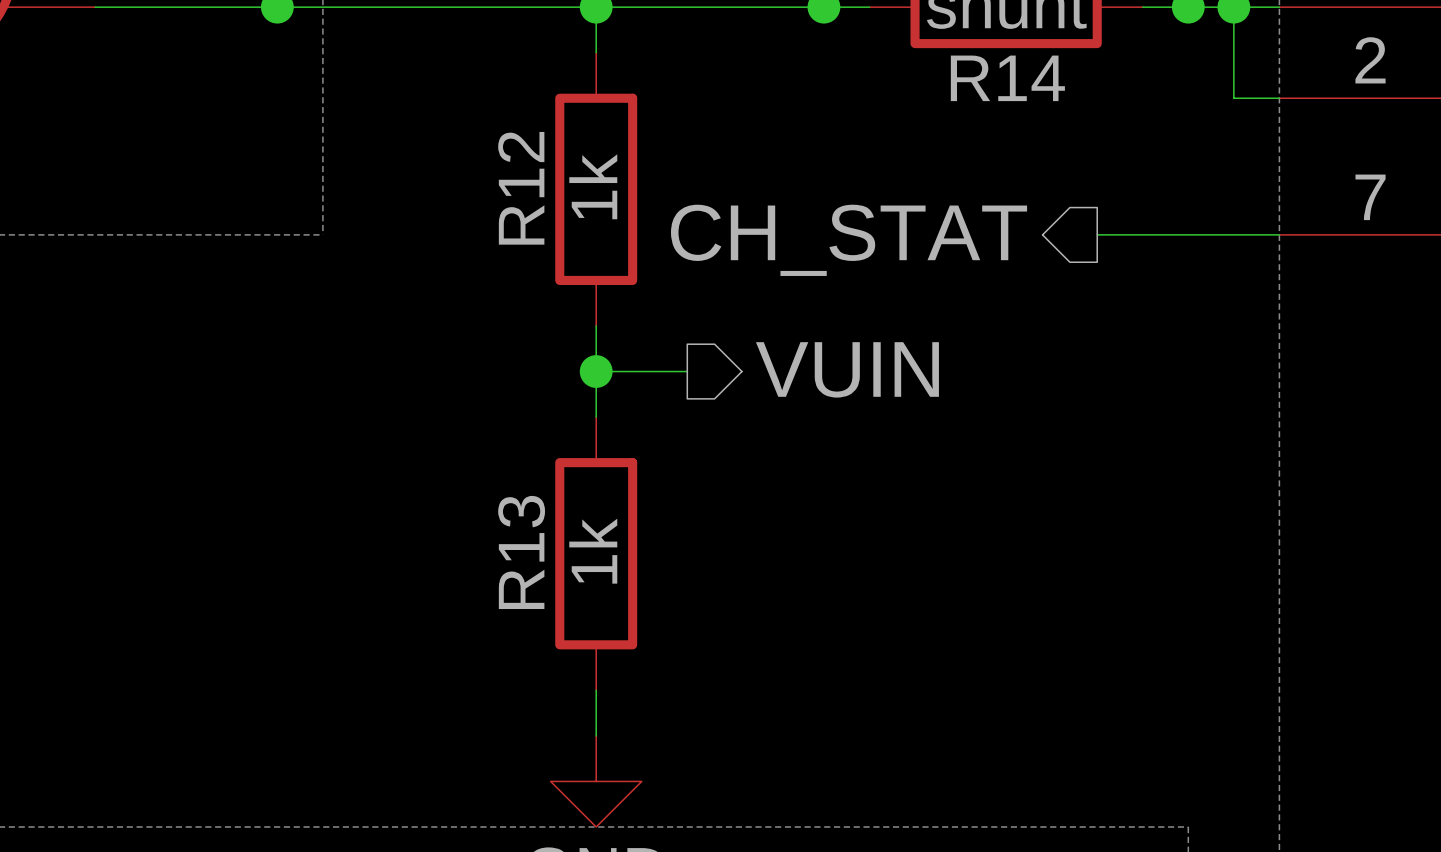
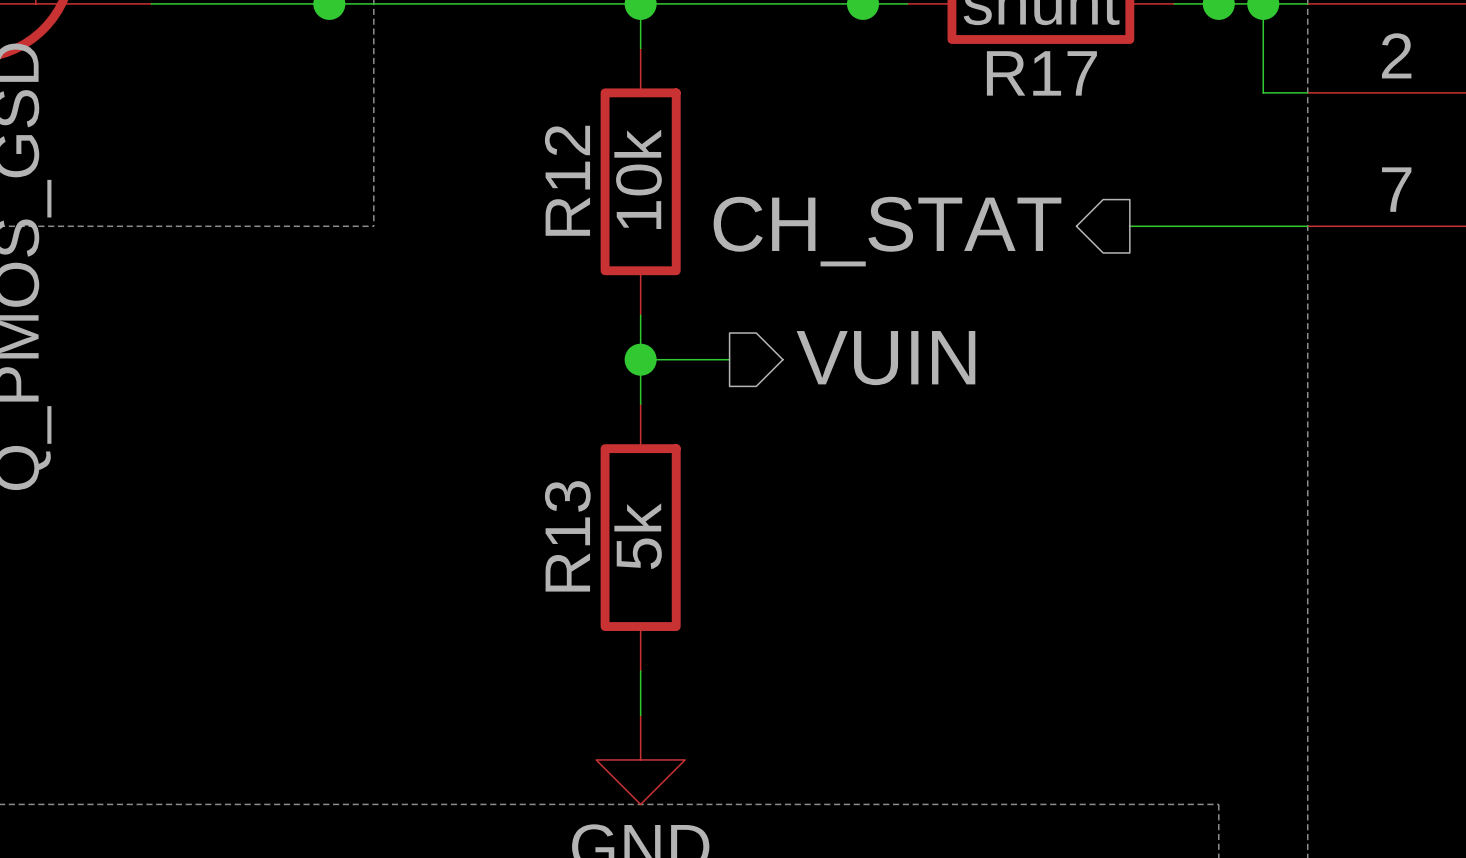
R14 name: R14 (1007, 78) -> R17 (1041, 73)
R12 value: 1k (593, 186) -> 10k (638, 179)
R13 value: 1k (593, 551) -> 5k (638, 536)

